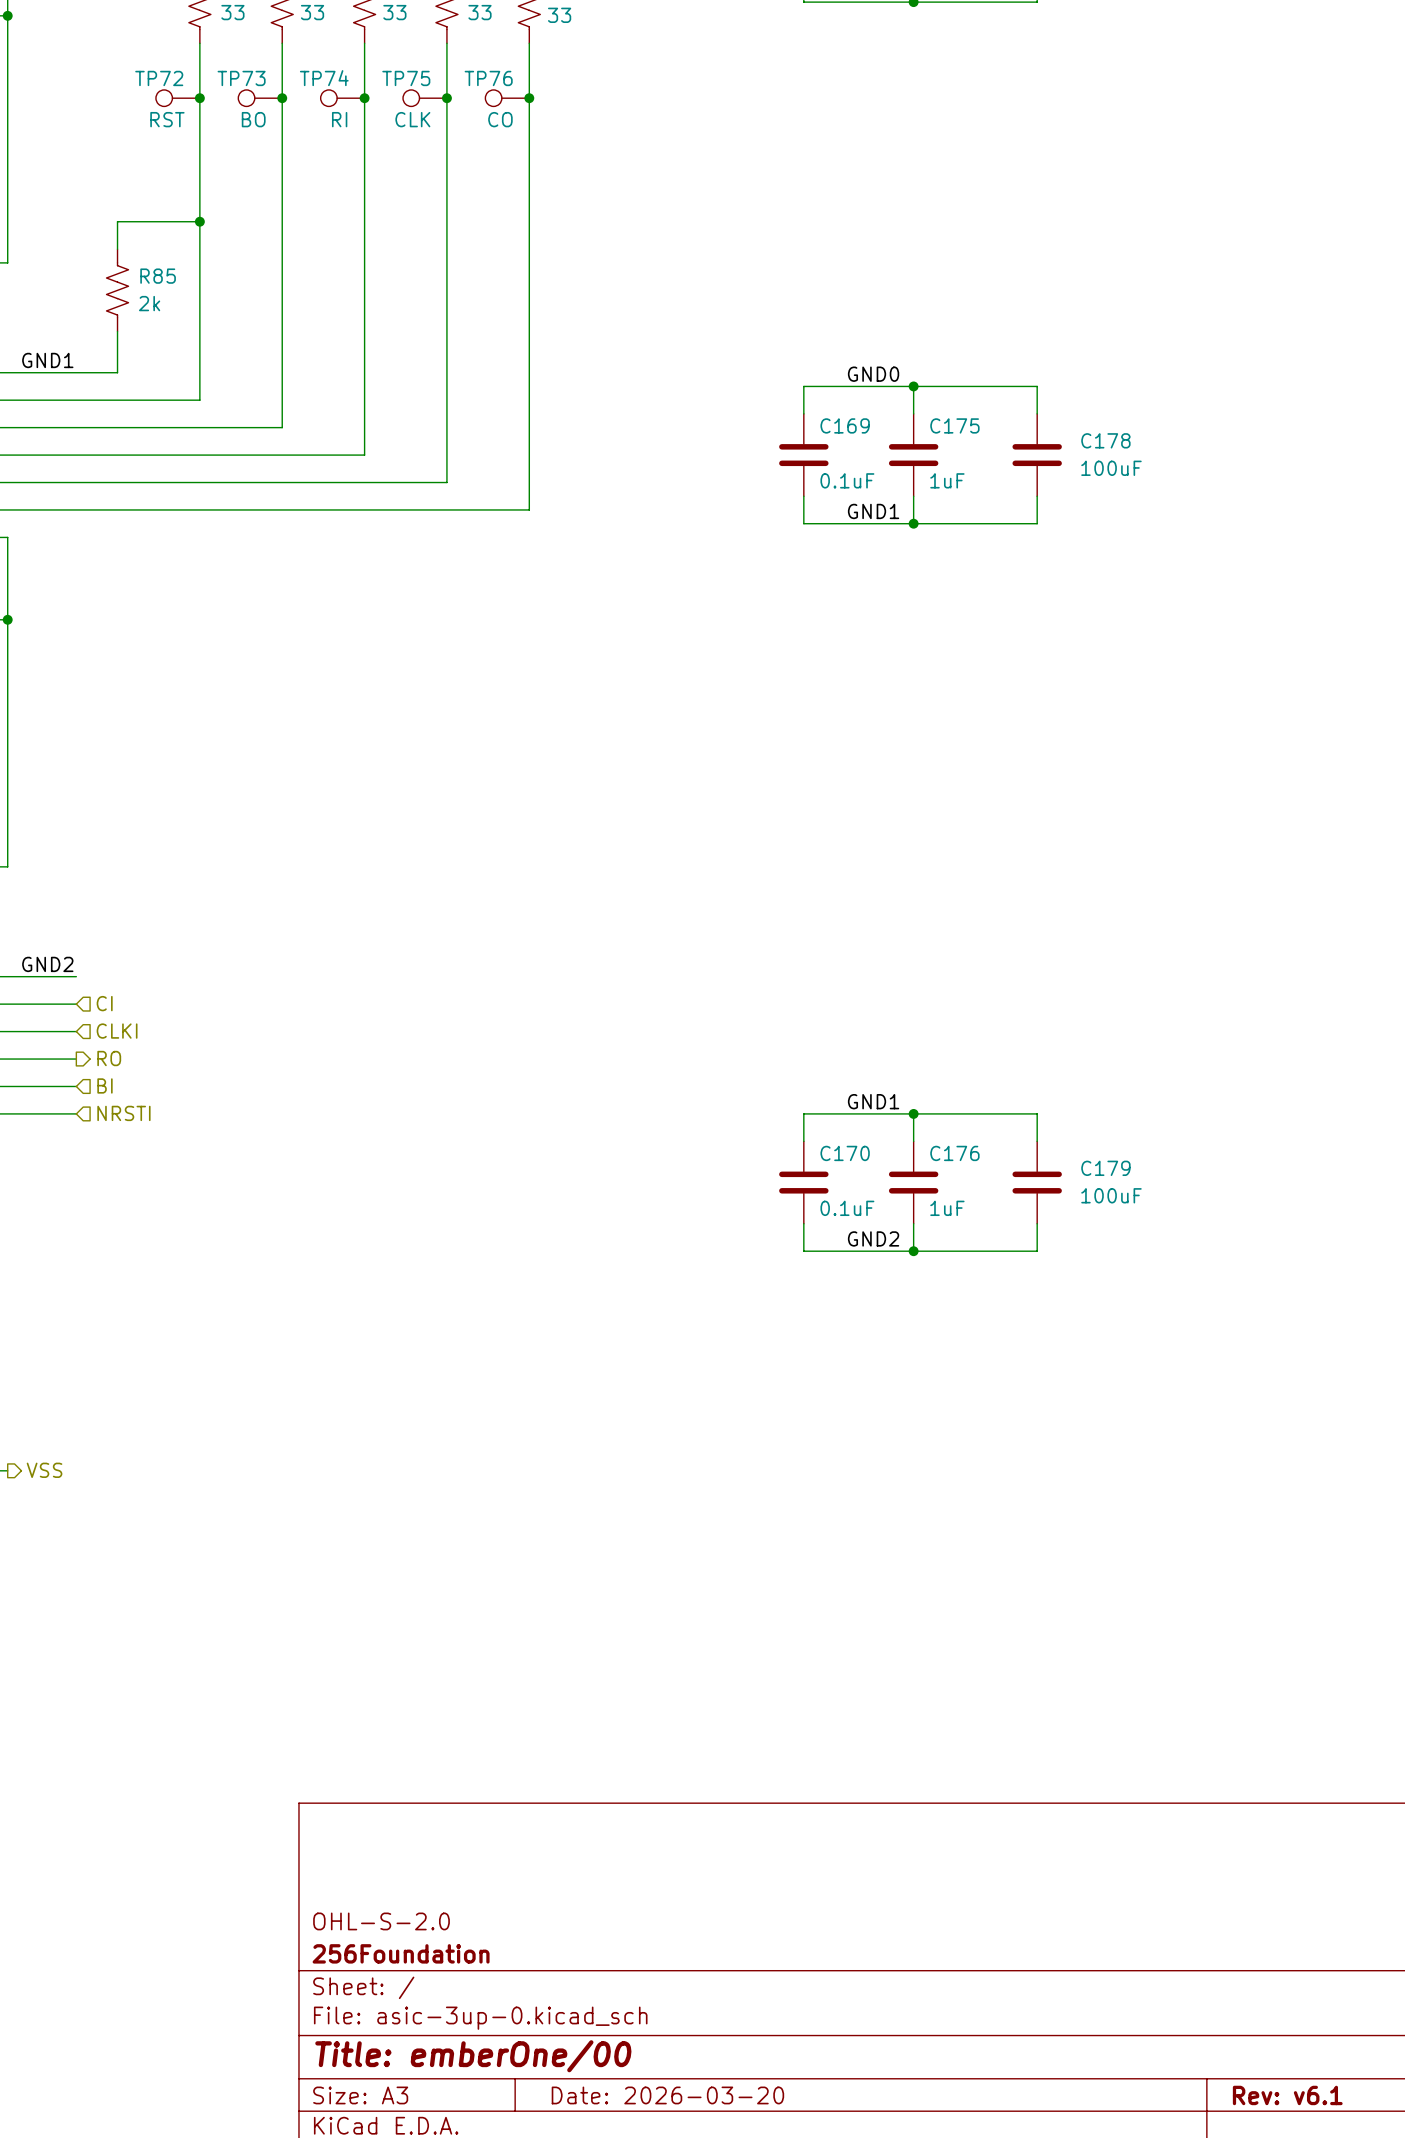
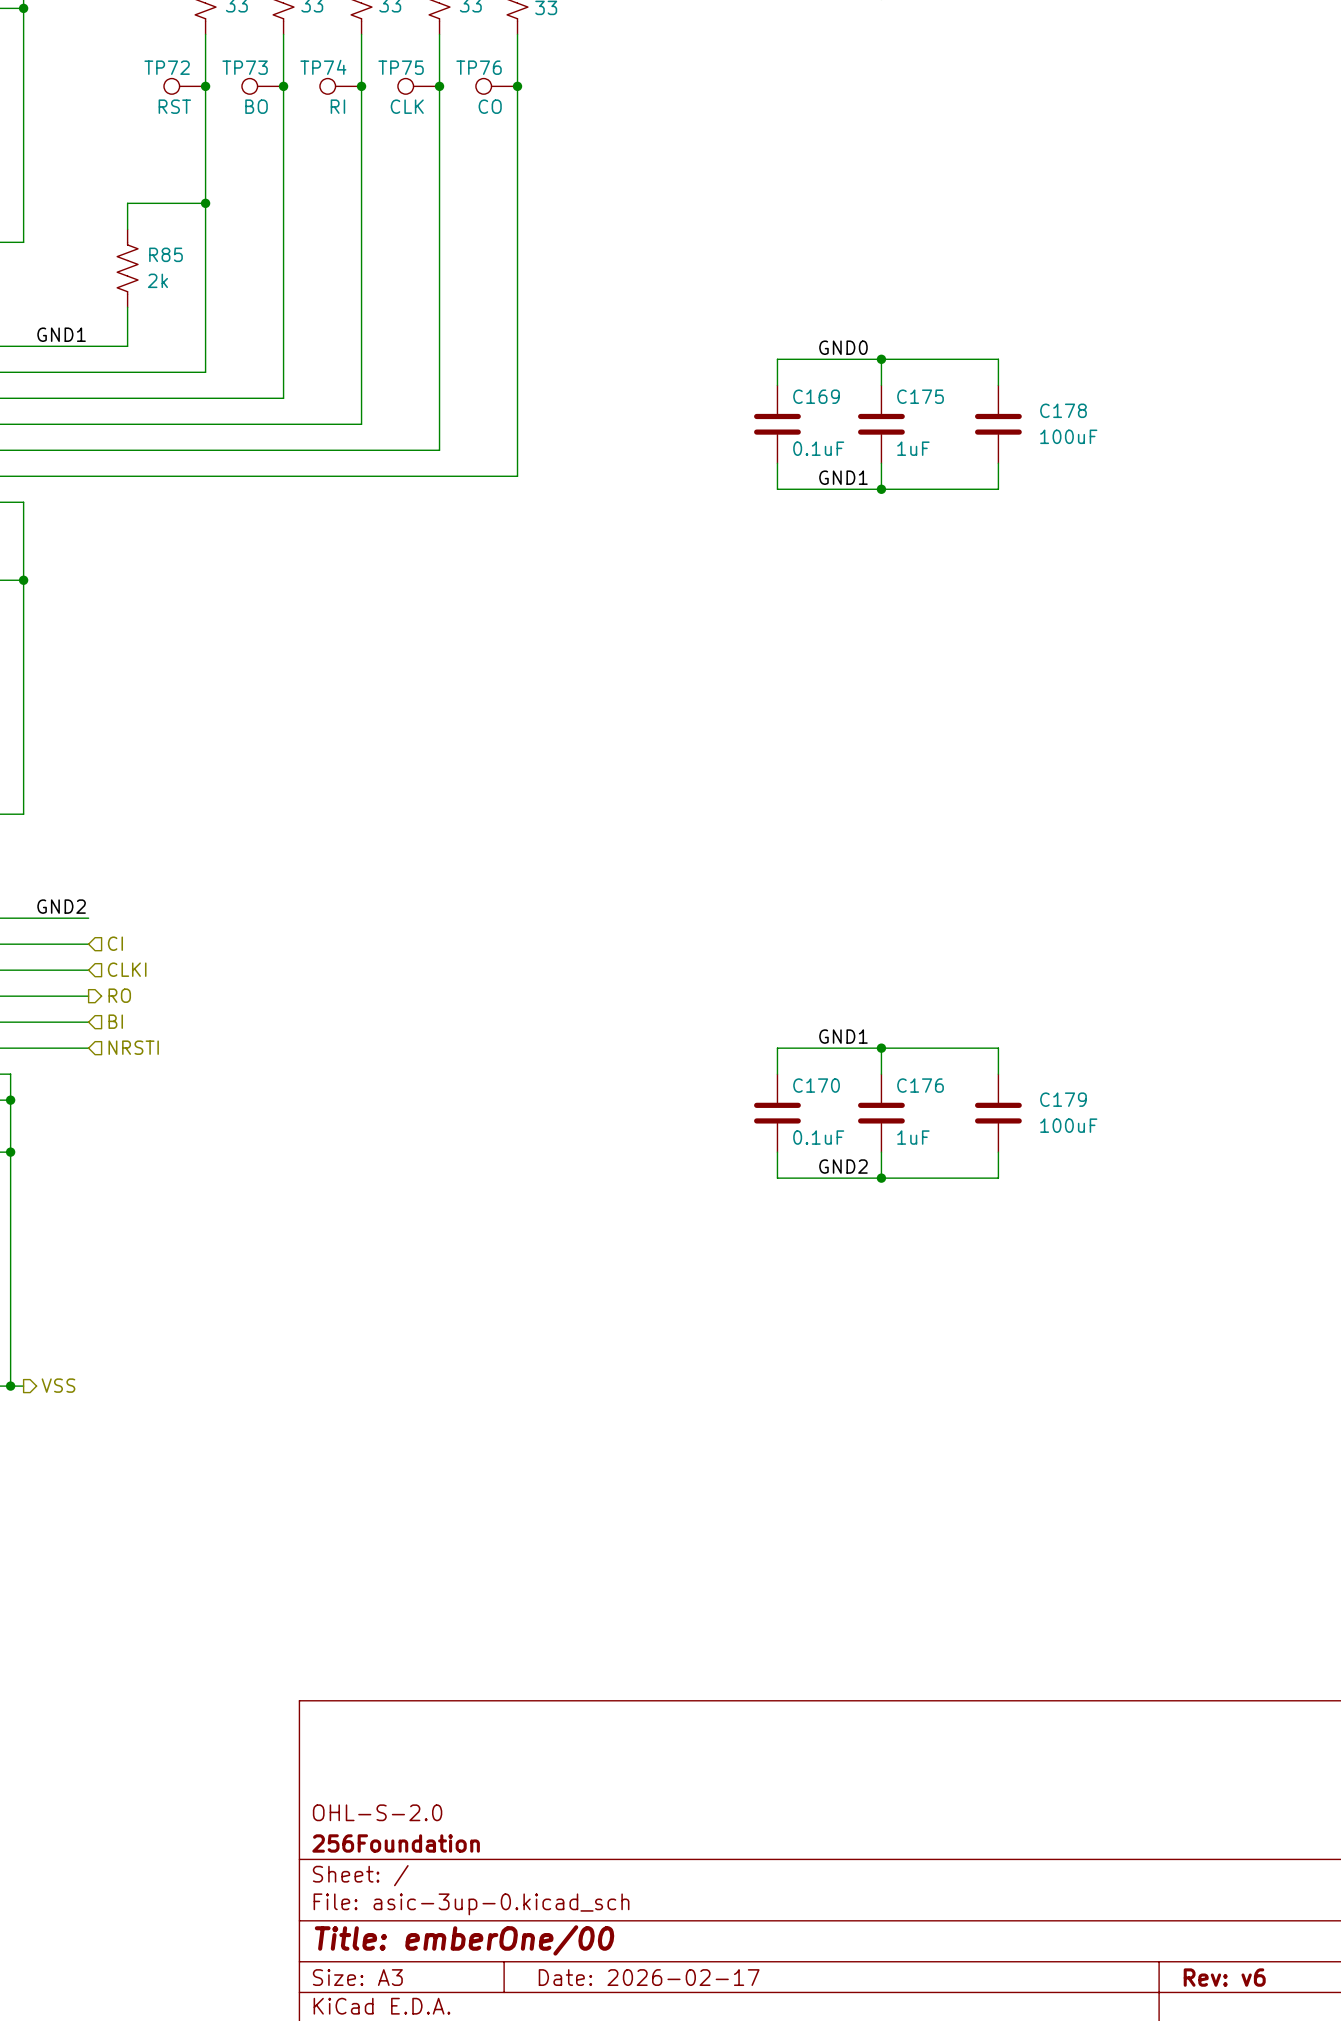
title block: Date: 2026-03-20 (667, 2095) -> Date: 2026-02-17 (649, 1977)
title block: Rev: v6.1 (1287, 2095) -> Rev: v6 (1224, 1977)

